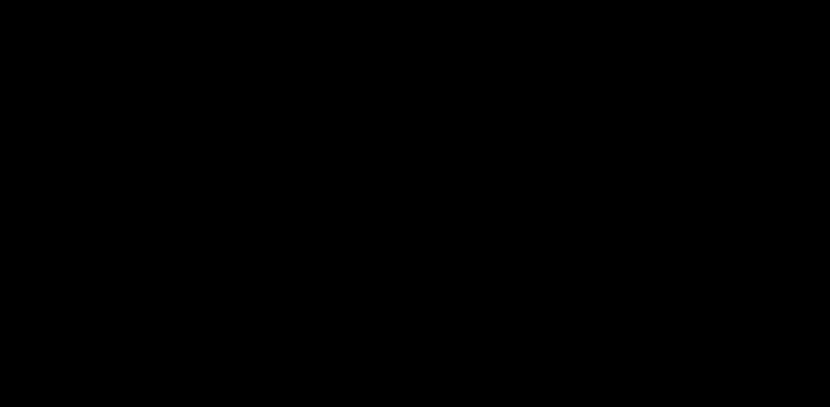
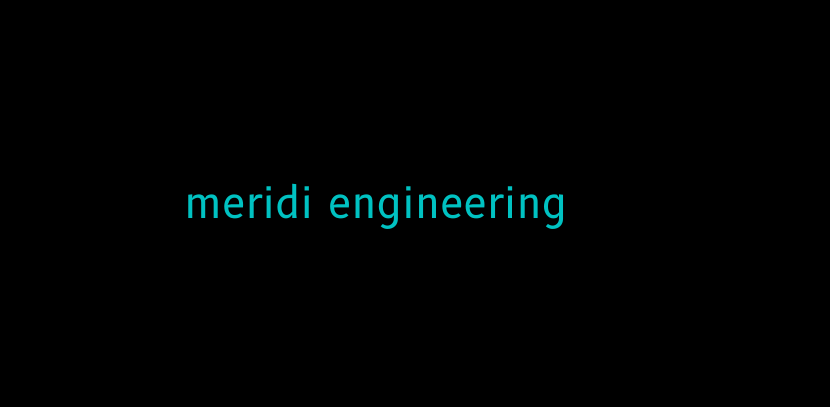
text: none -> meridi engineering (375, 206)

